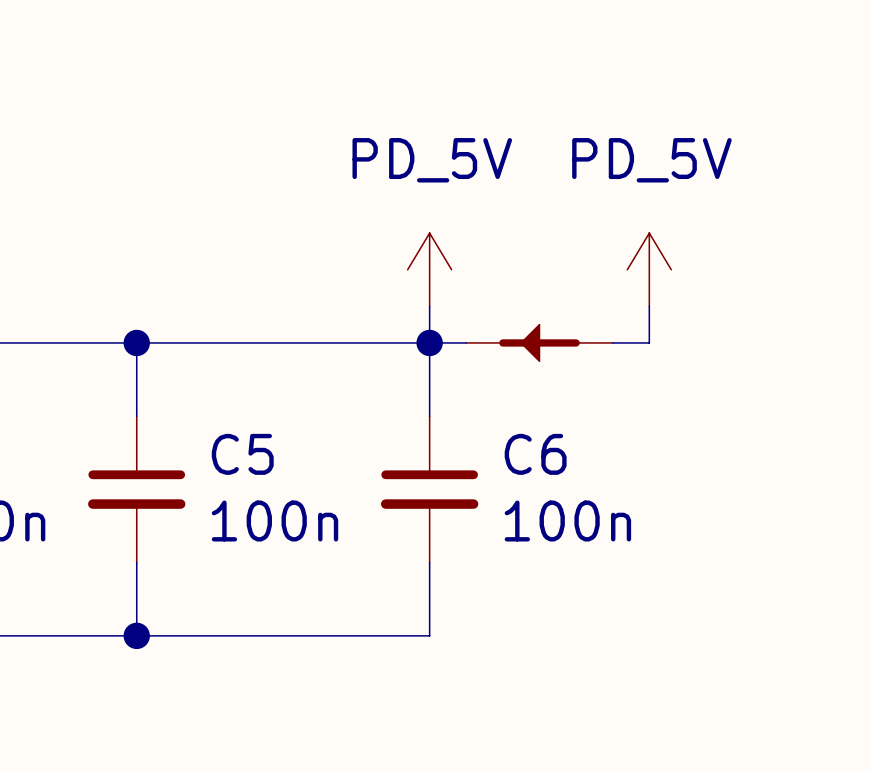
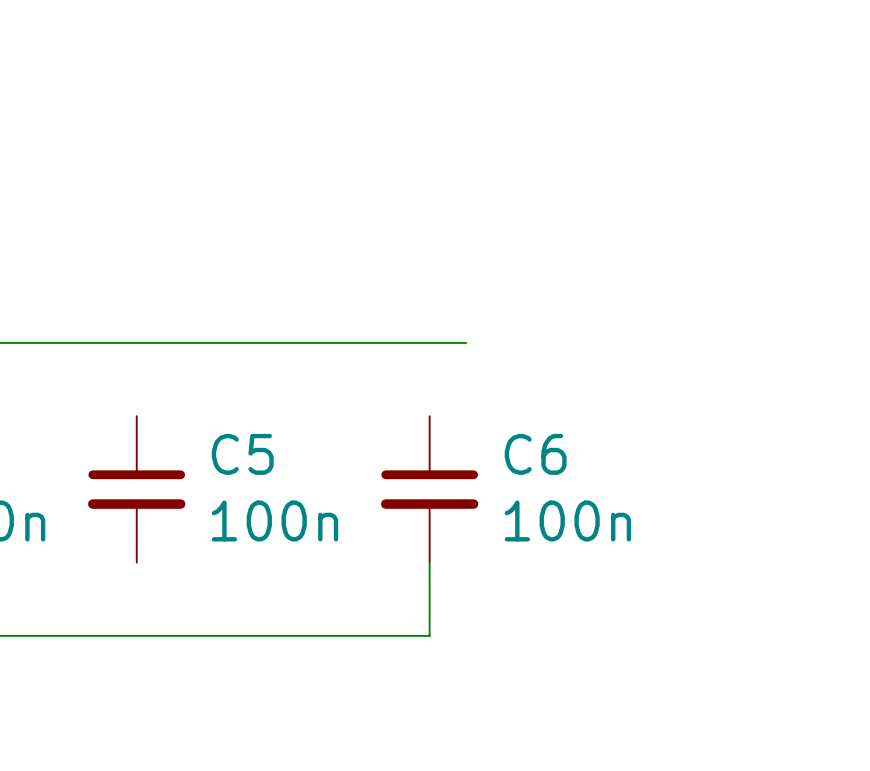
power symbol: PD_5V (429, 269) -> none
power symbol: PD_5V (649, 269) -> none
wire: (429, 306) (429, 416) -> none
wire: (649, 306) (649, 342) (612, 342) -> none
wire: (136, 342) (136, 416) -> none
junction: (136, 342) -> none
junction: (429, 342) -> none
part: (539, 342) -> none
wire: (136, 562) (136, 635) -> none
junction: (136, 635) -> none

